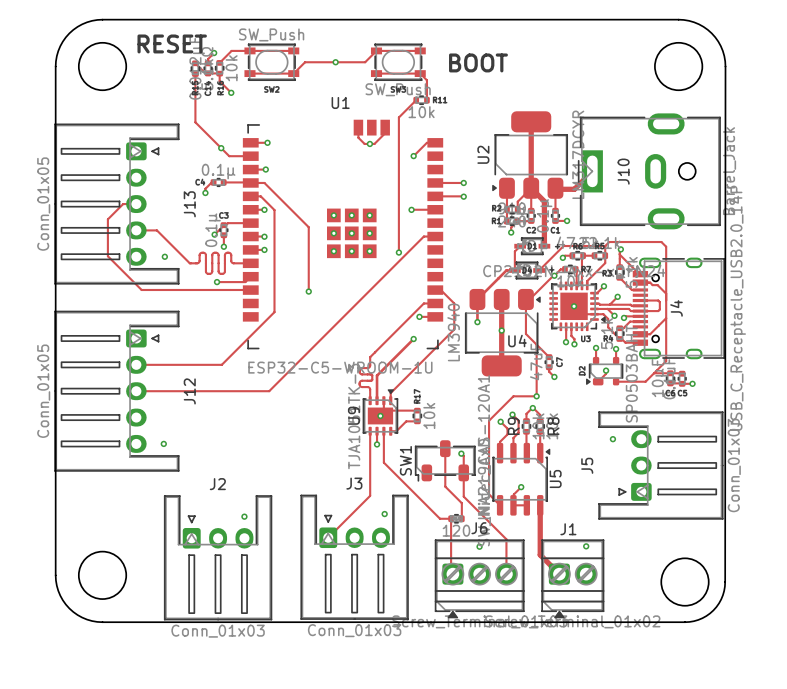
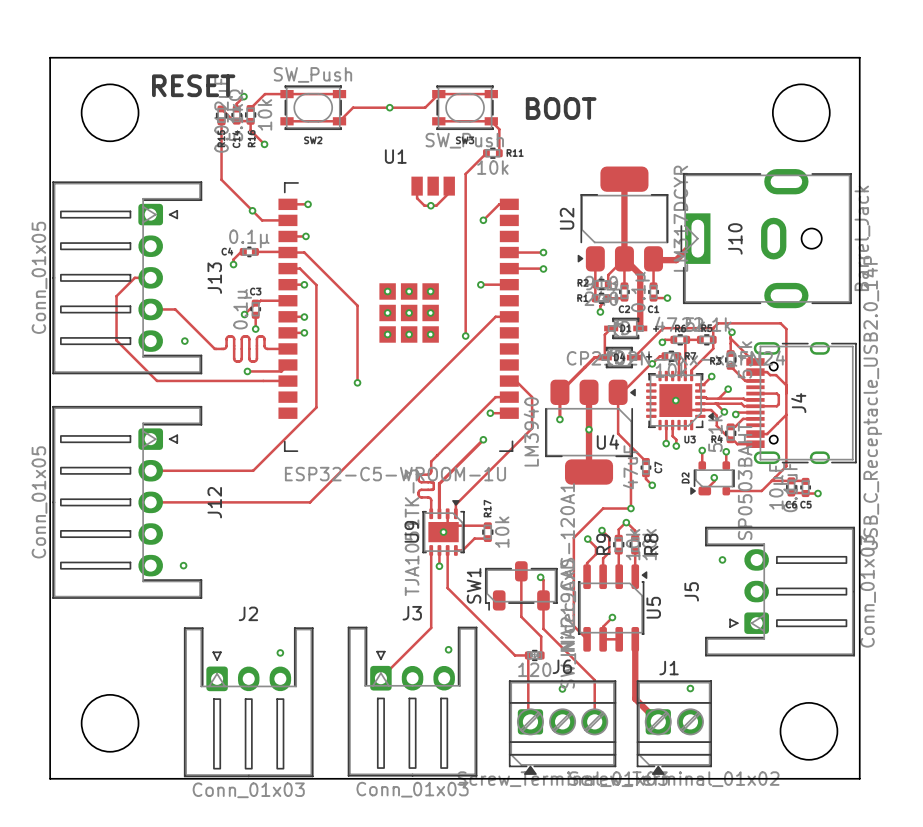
board edge: (102, 19) (678, 19) (694, 22) (711, 33) (722, 51) (725, 66) (725, 582) (721, 599) (713, 610) (702, 618) (685, 622) (102, 622) (87, 619) (69, 608) (58, 590) (55, 575) (55, 61) (60, 46) (69, 33) (87, 22) (102, 19) -> (50, 57) (50, 778) (859, 778) (859, 57) (50, 57)

